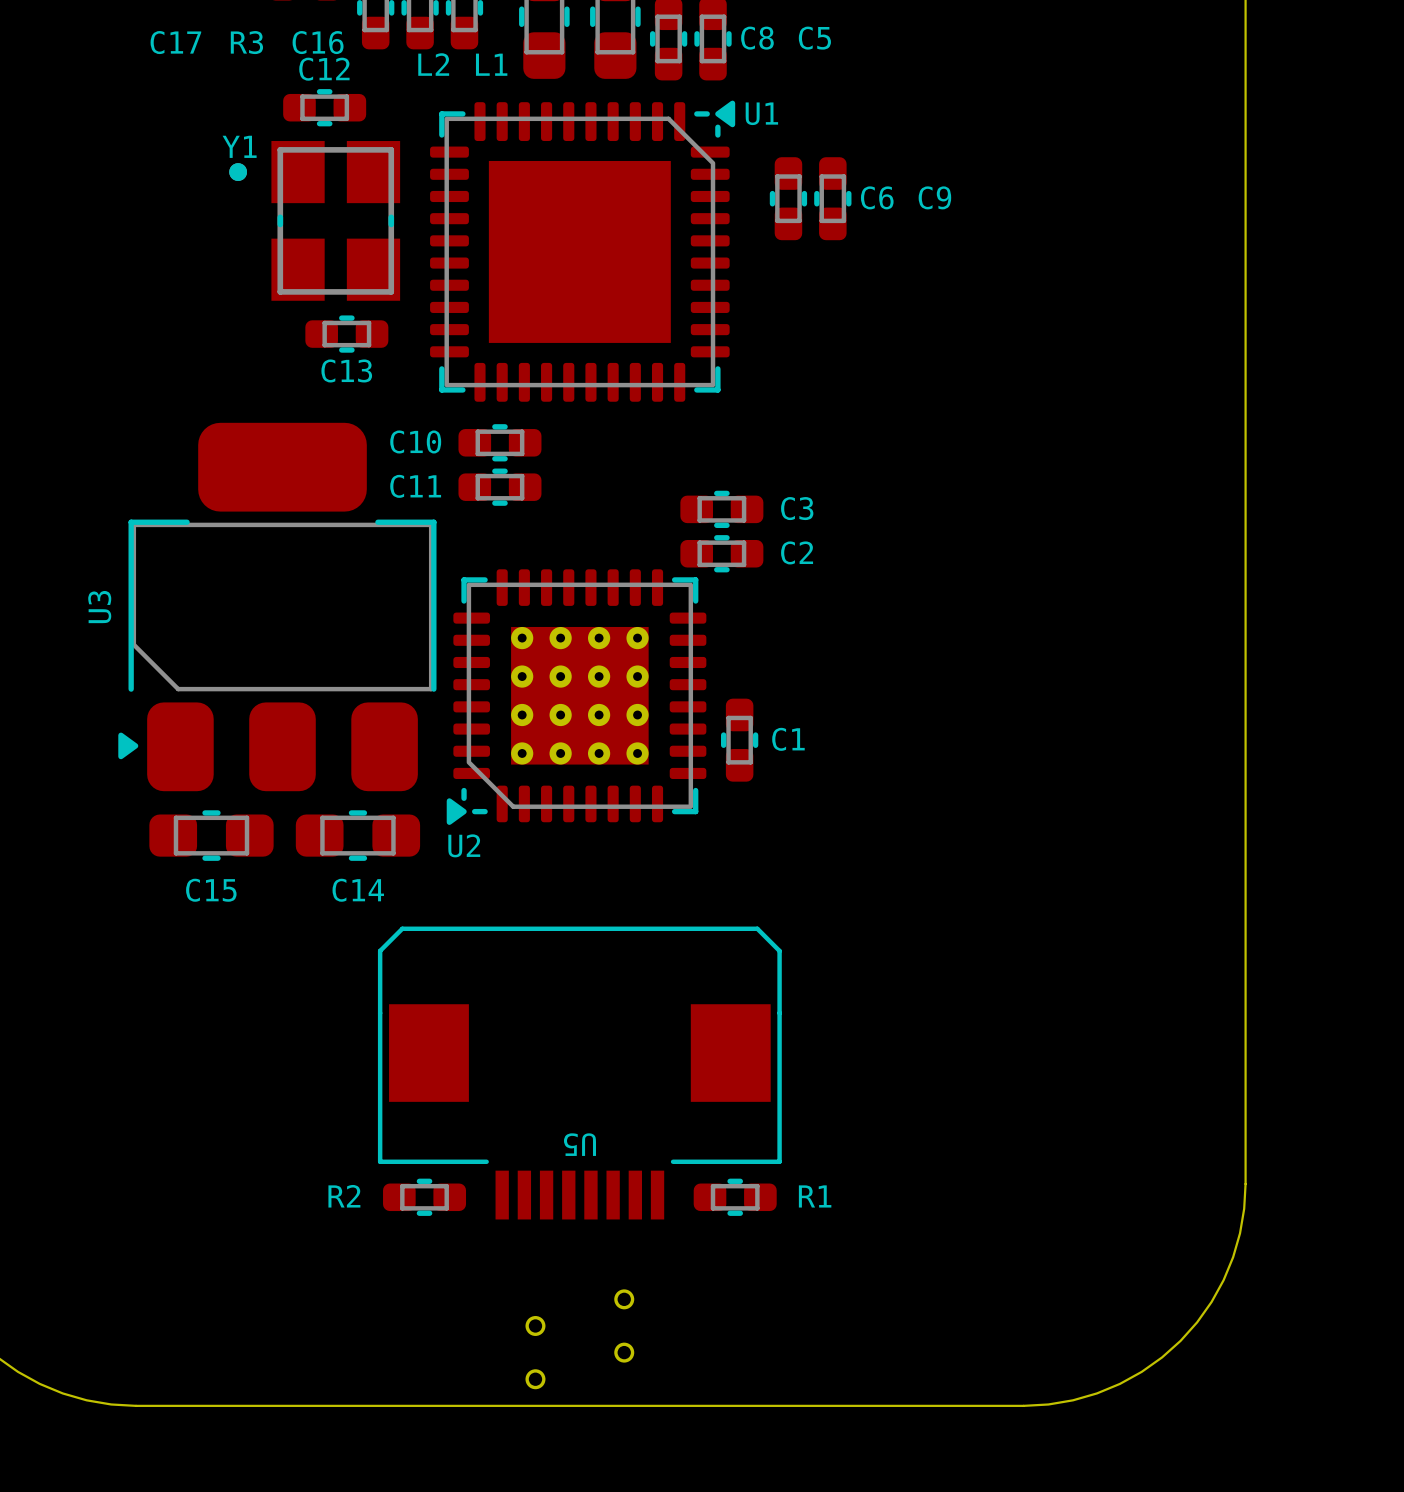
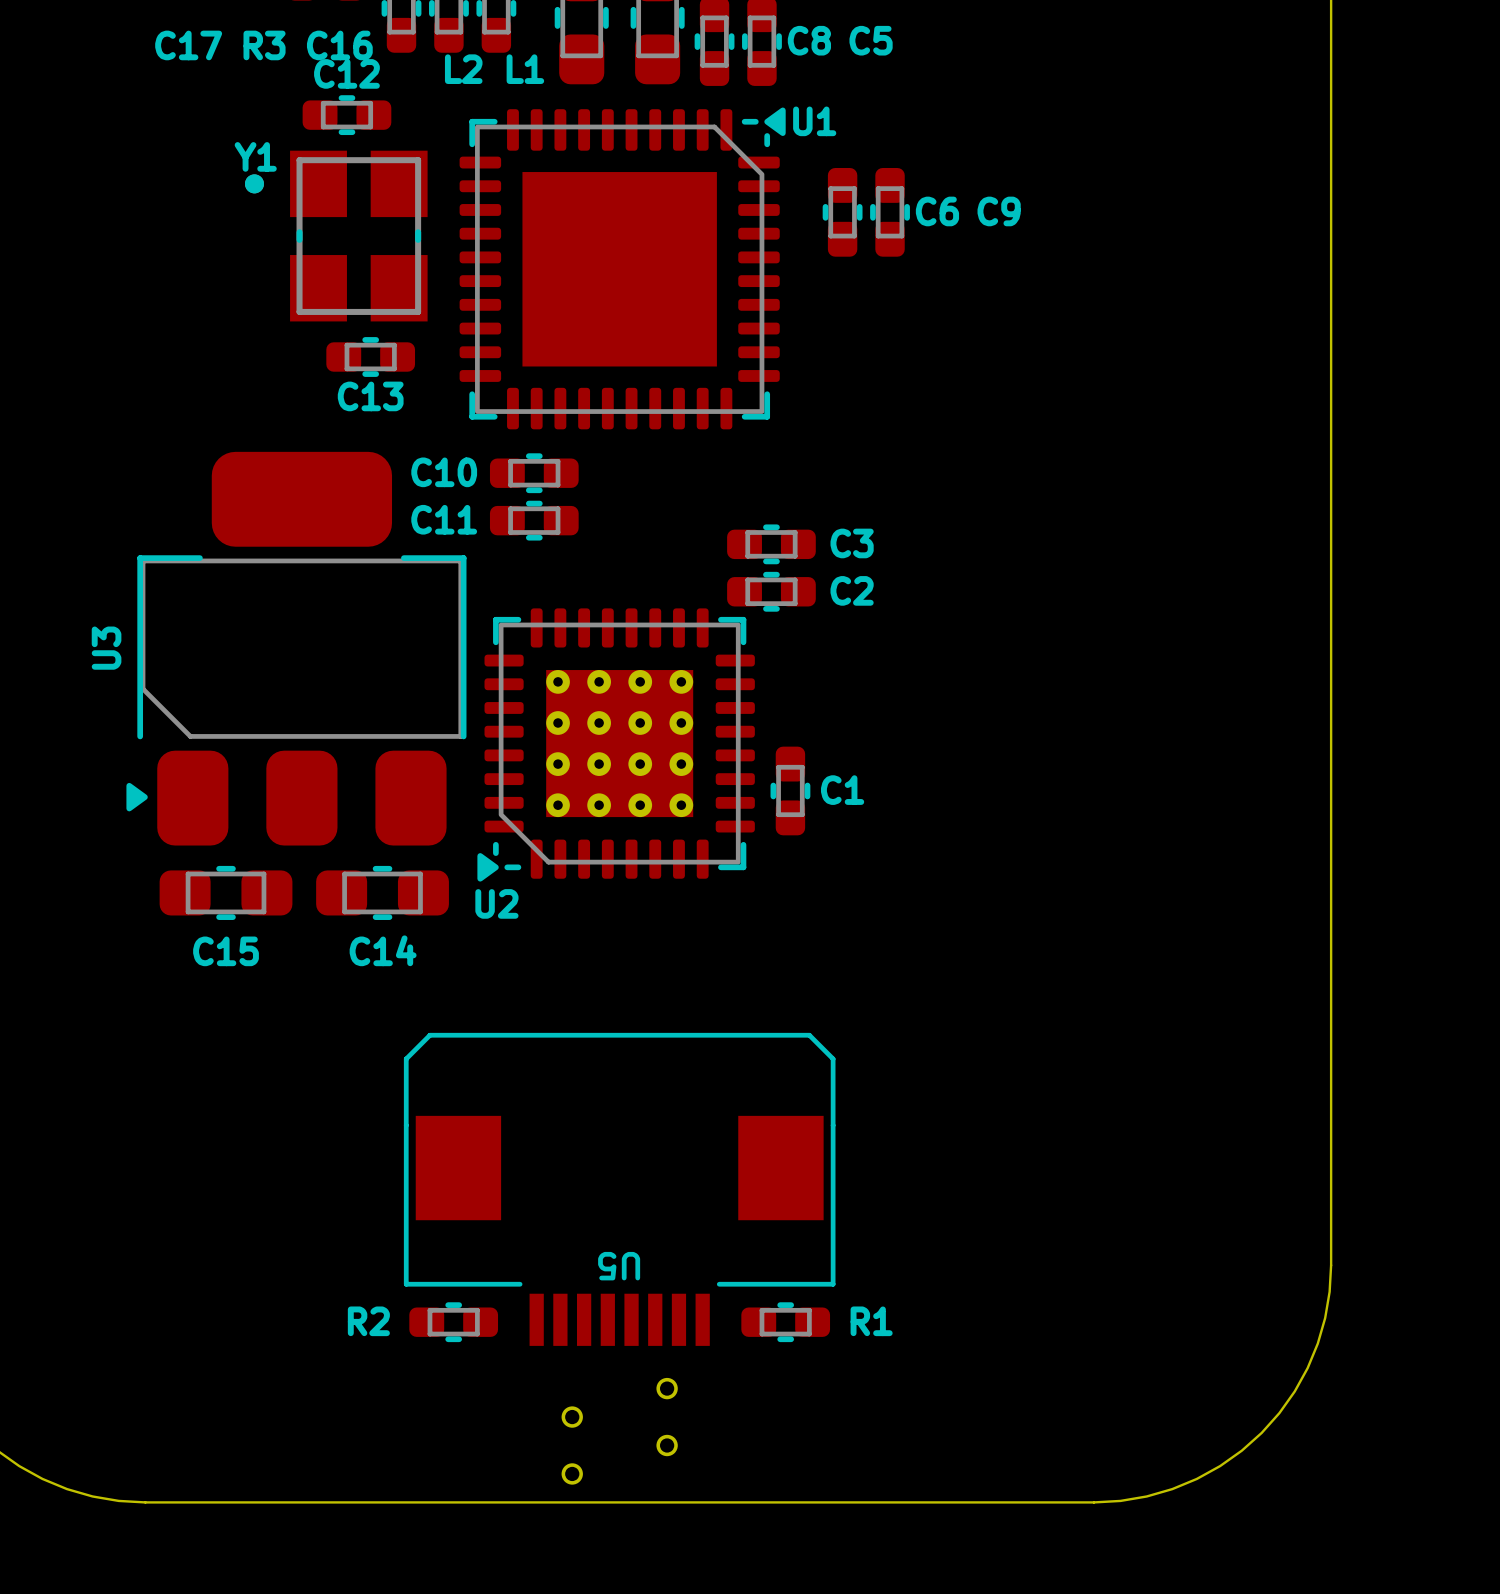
U5 position: (579, 1073) -> (619, 1189)
R2 position: (424, 1197) -> (453, 1322)
R1 position: (735, 1197) -> (785, 1322)

